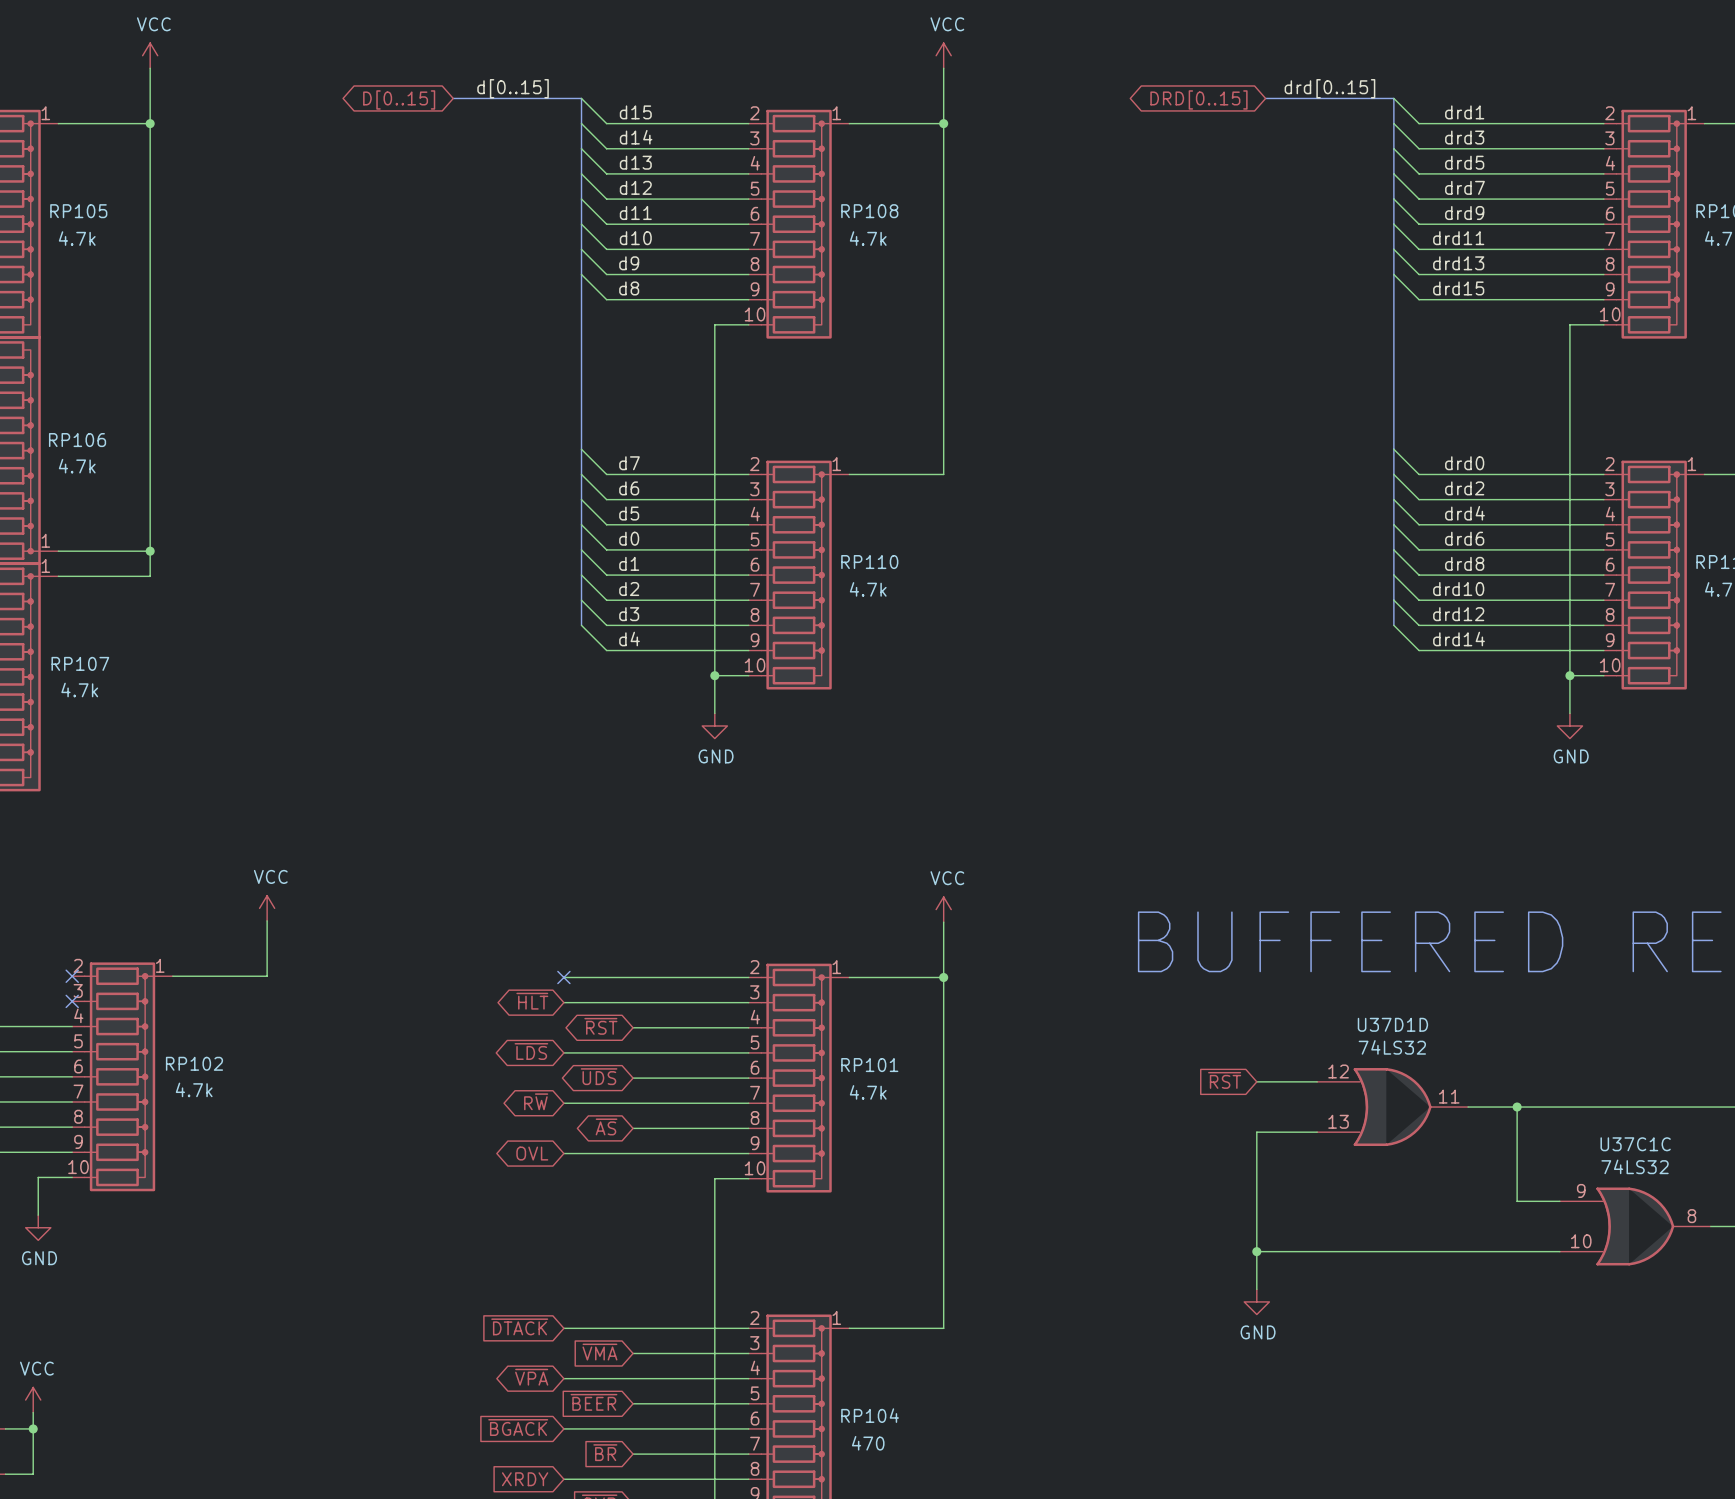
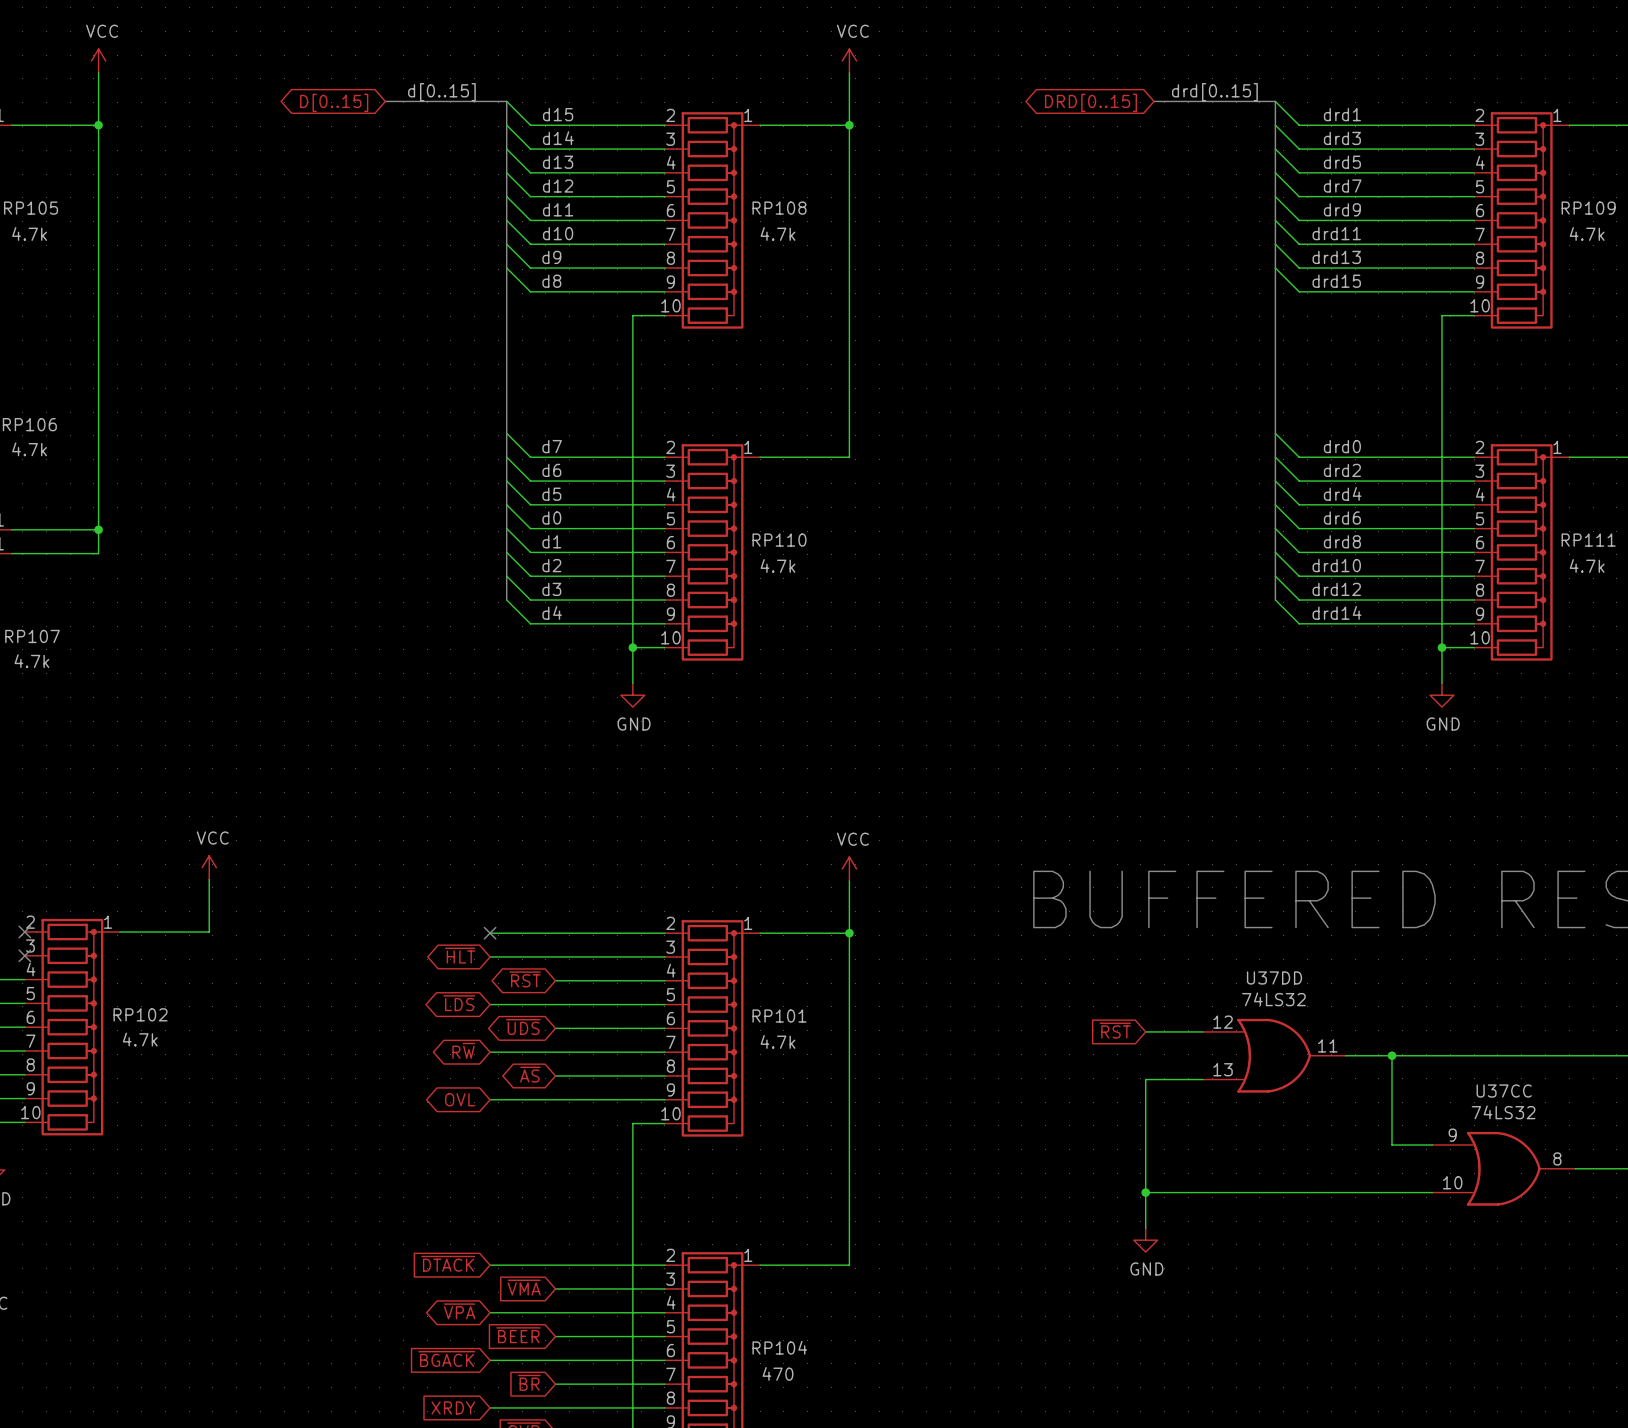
U37D1D name: U37D1D (1392, 1024) -> U37DD (1274, 977)
U37C1C name: U37C1C (1635, 1144) -> U37CC (1504, 1091)

